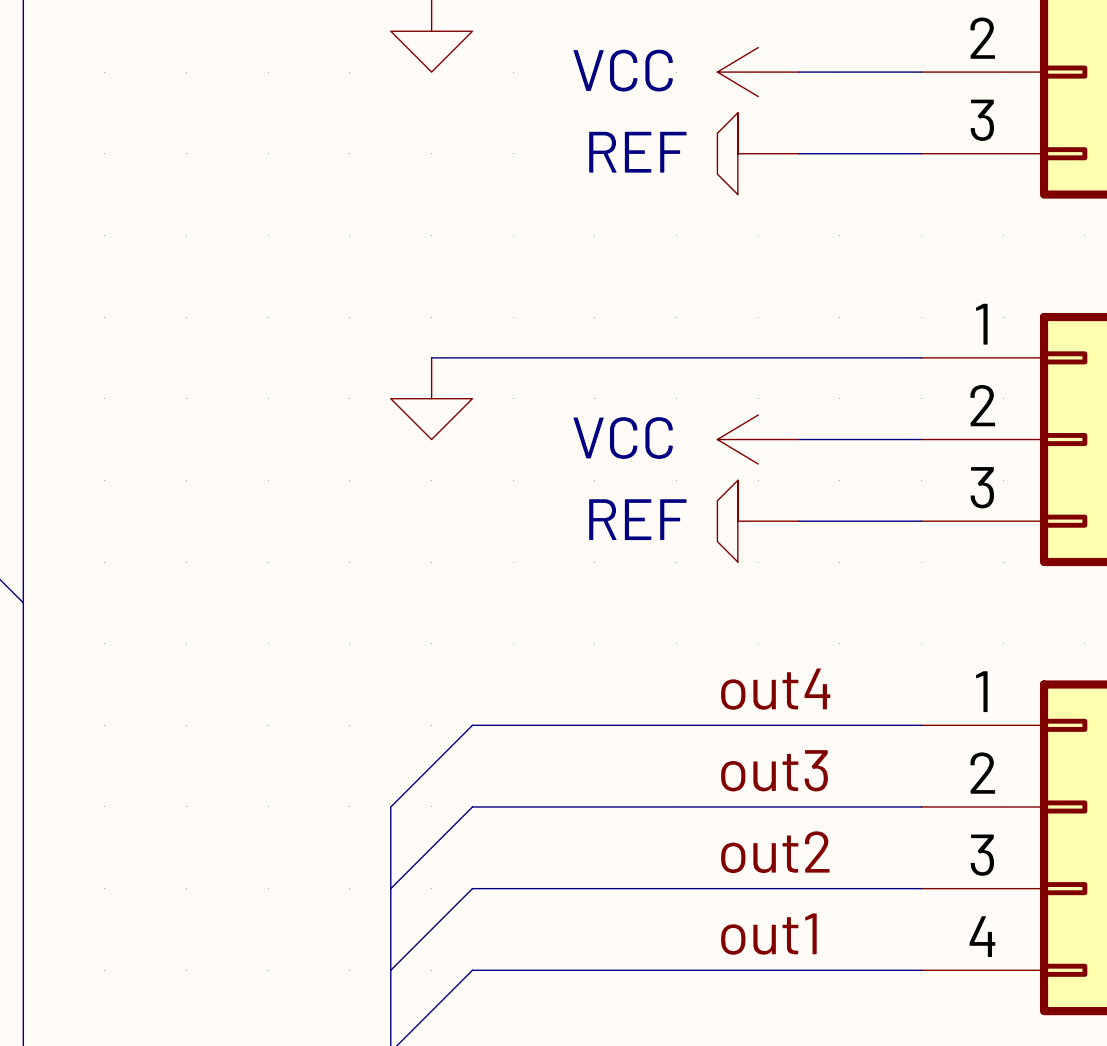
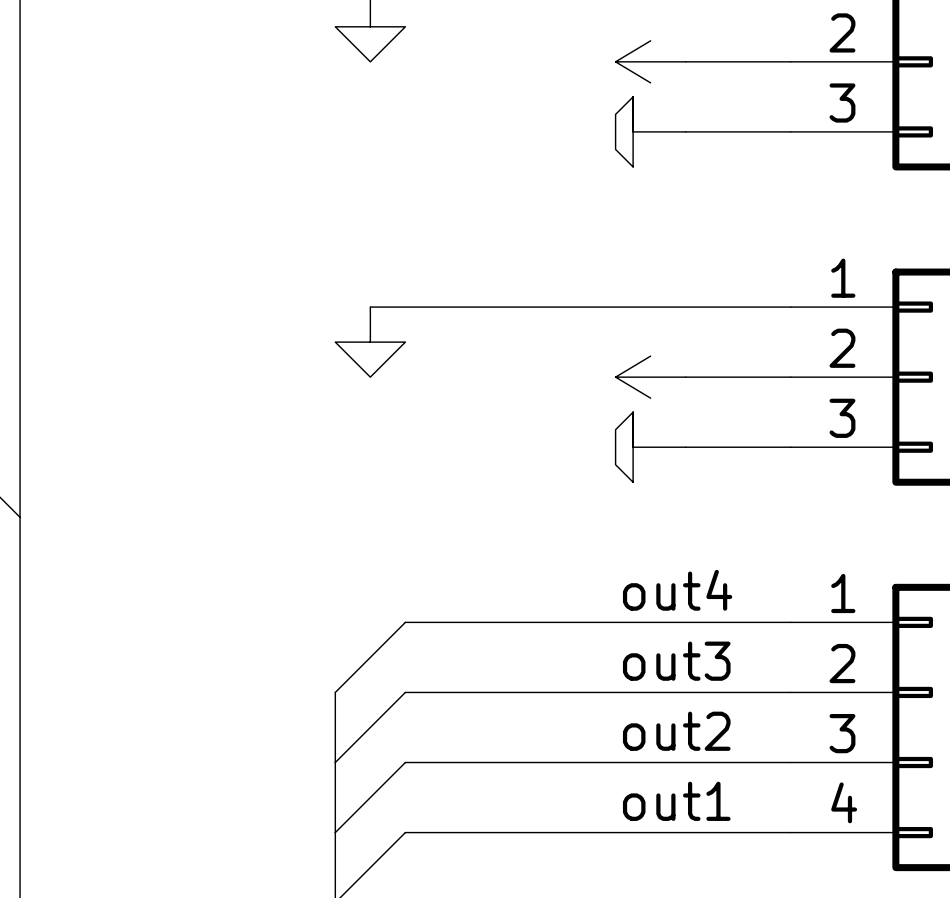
power symbol text: VCC (623, 70) -> none
power symbol text: REF (637, 152) -> none
power symbol text: VCC (623, 438) -> none
power symbol text: REF (637, 519) -> none

